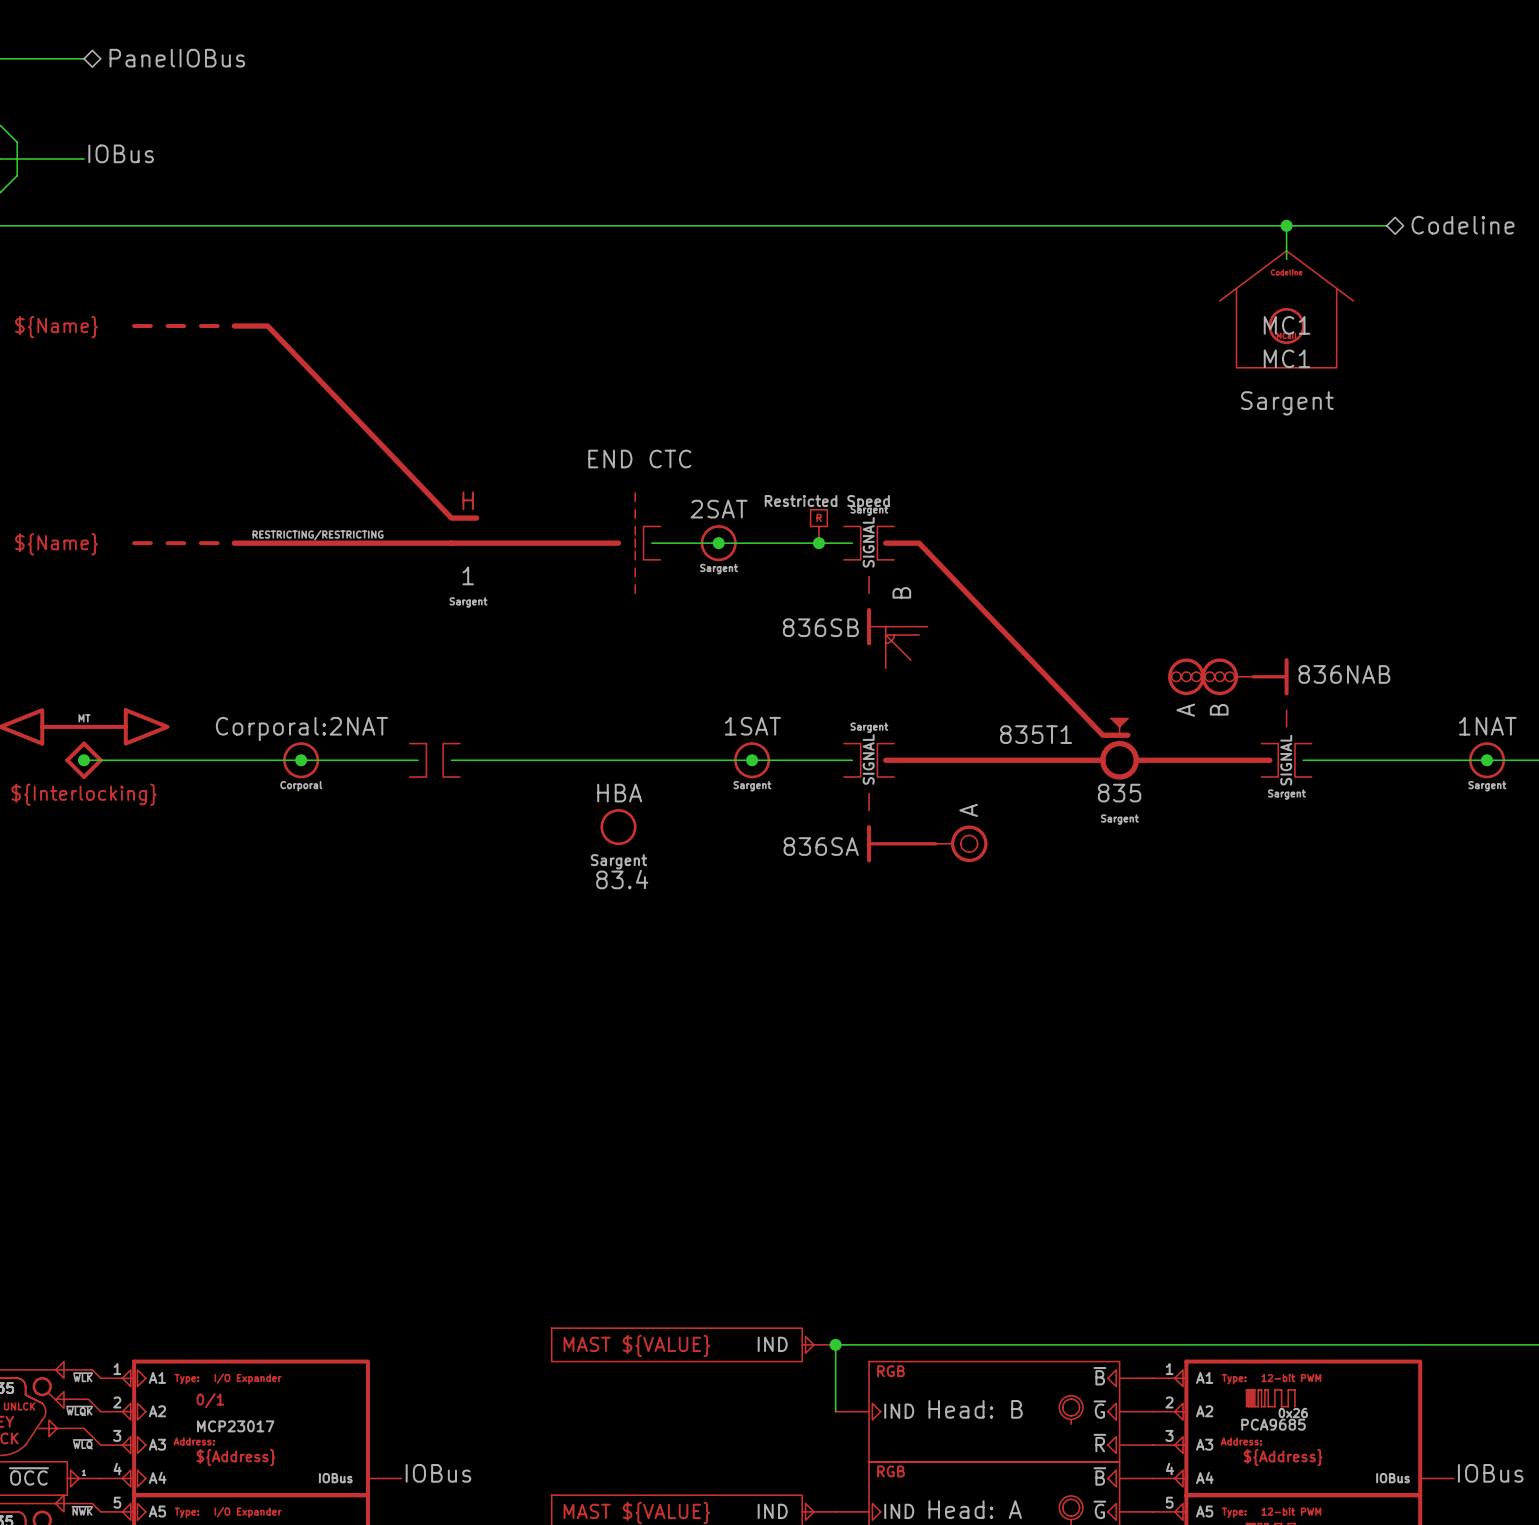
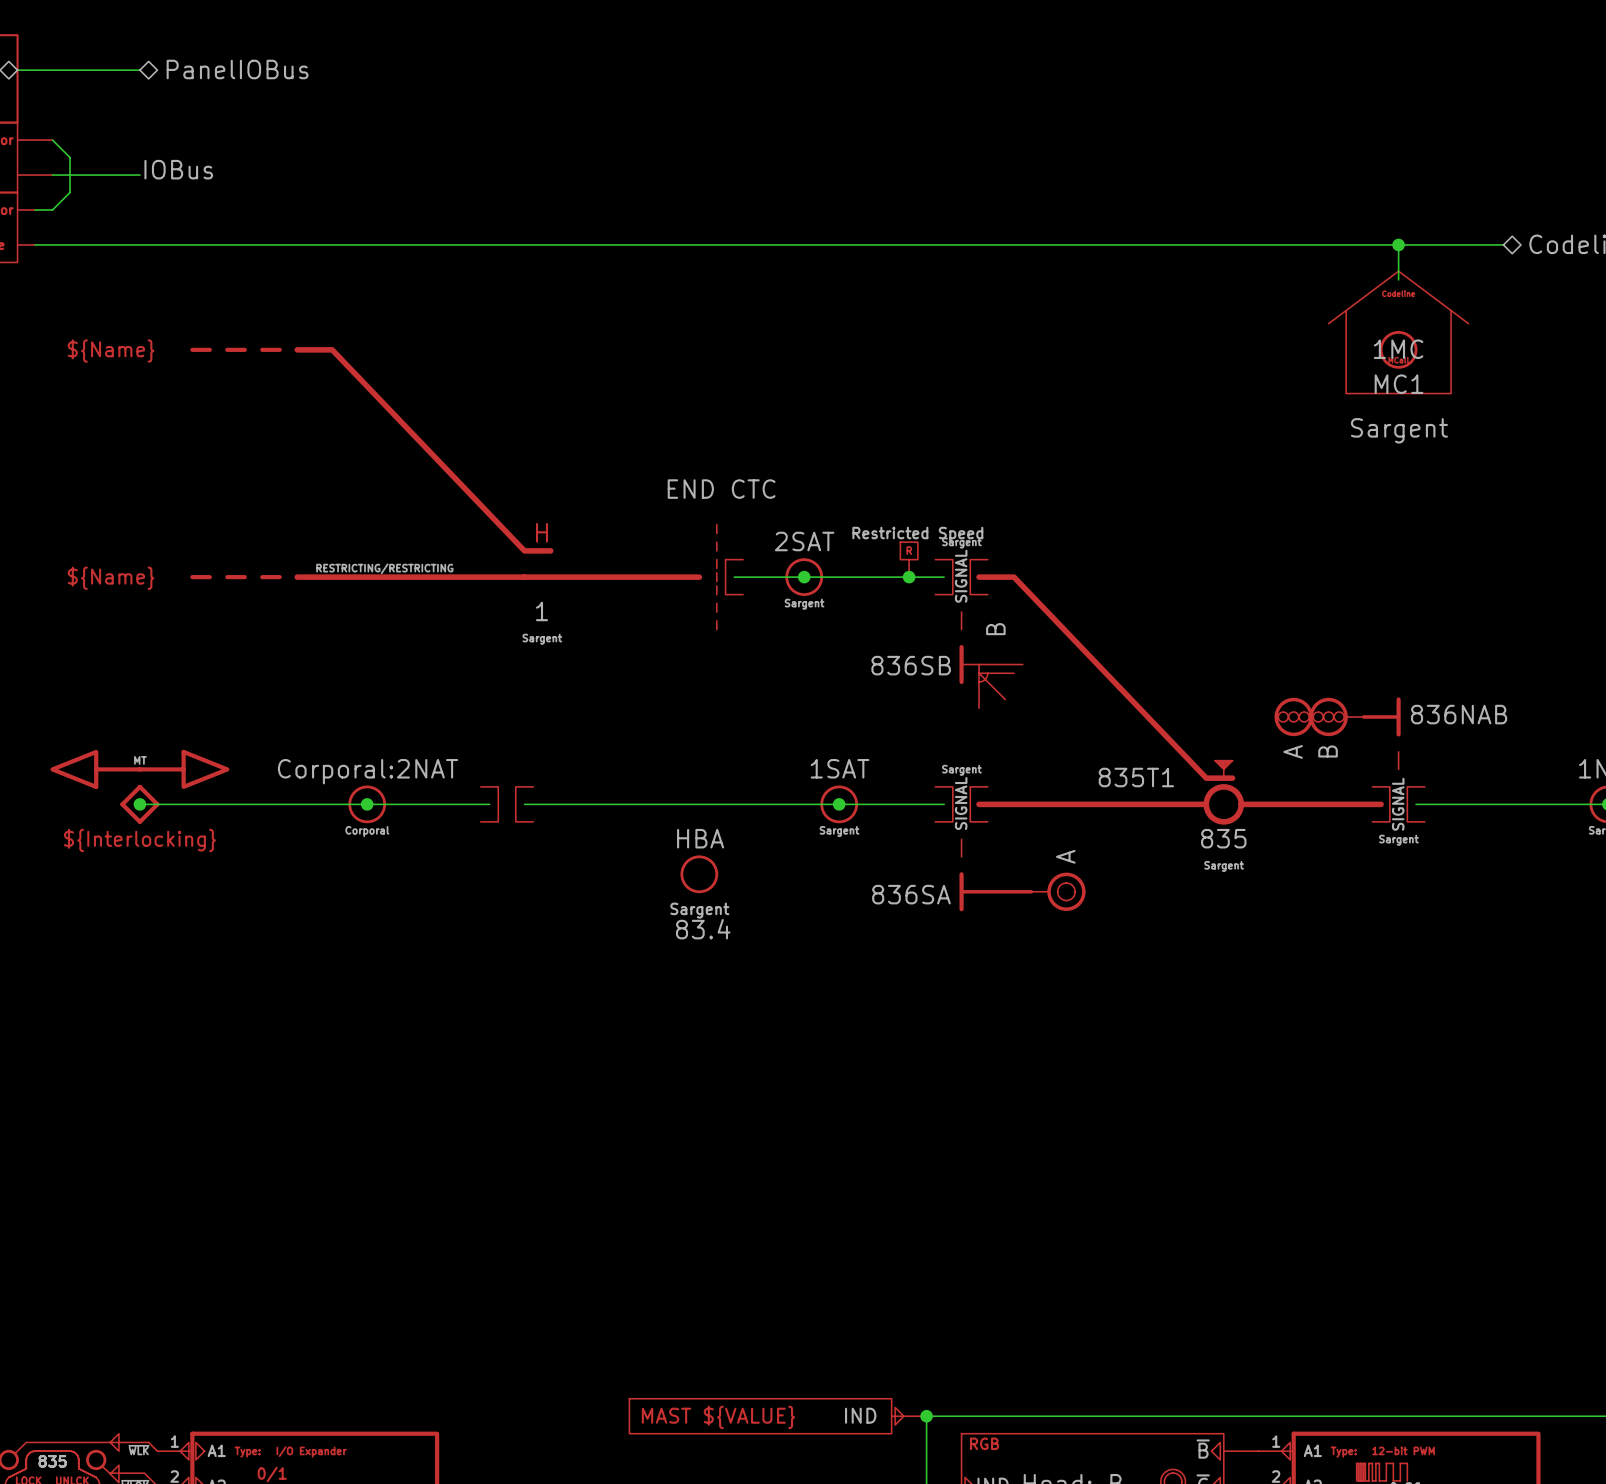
MC1 text: none -> 1MC (1398, 349)
MC1 value: MC1 (1287, 325) -> none

